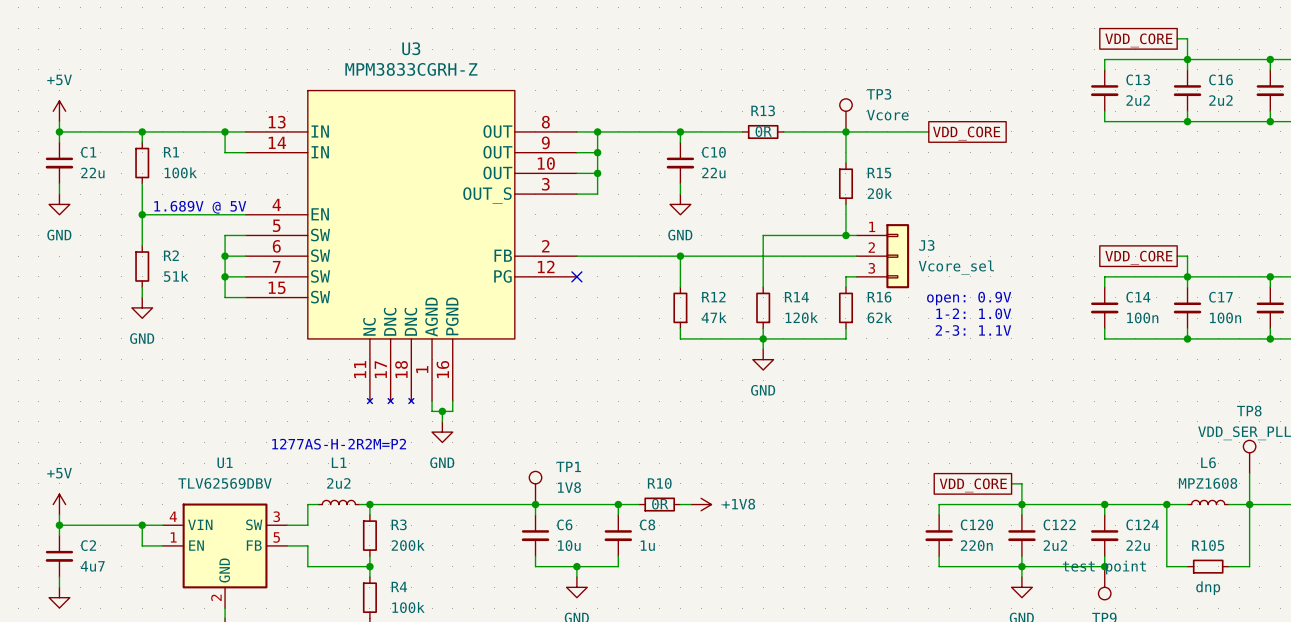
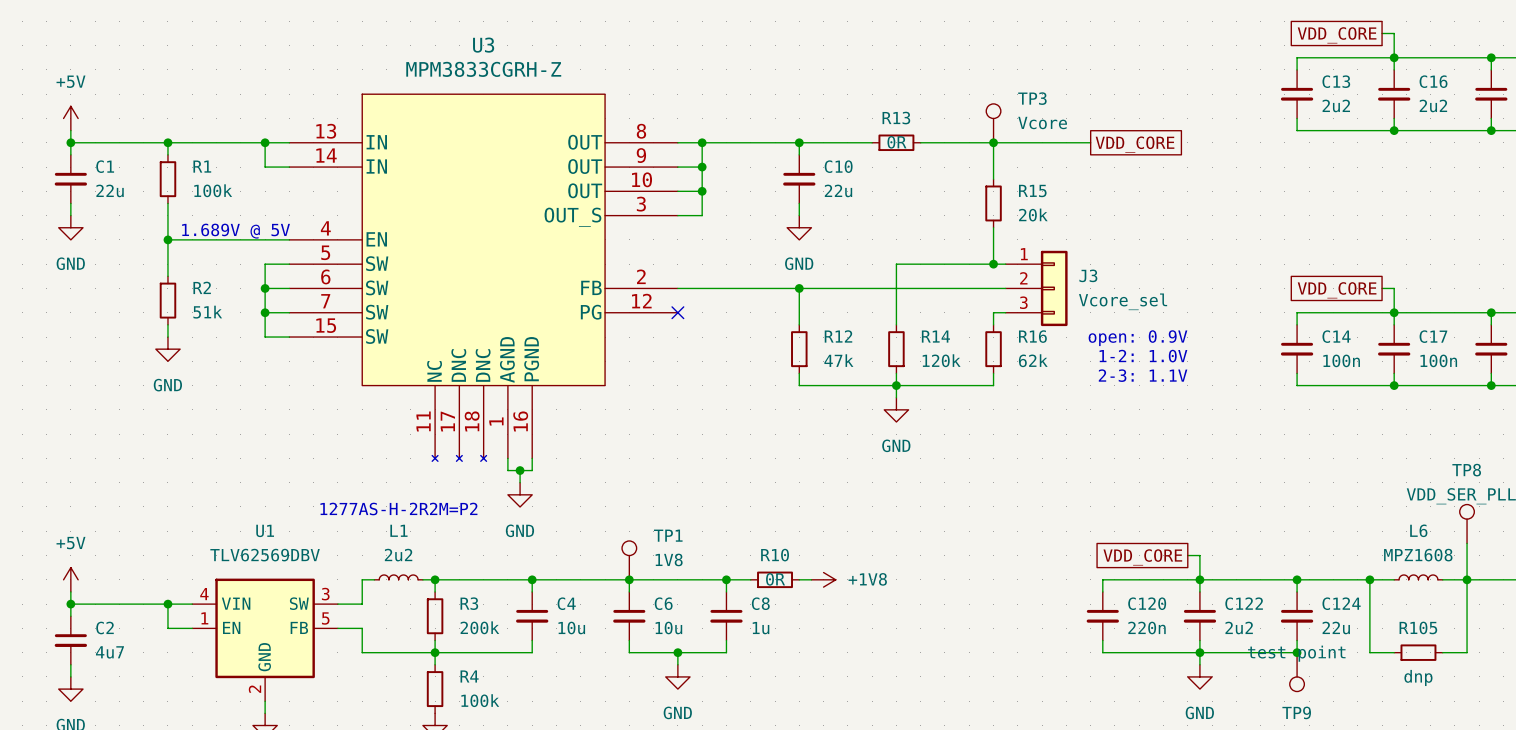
wire: none -> (532, 579) (532, 591)
junction: none -> (532, 579)
C4: none -> 10u (532, 616)
wire: none -> (532, 640) (532, 652) (435, 652)

